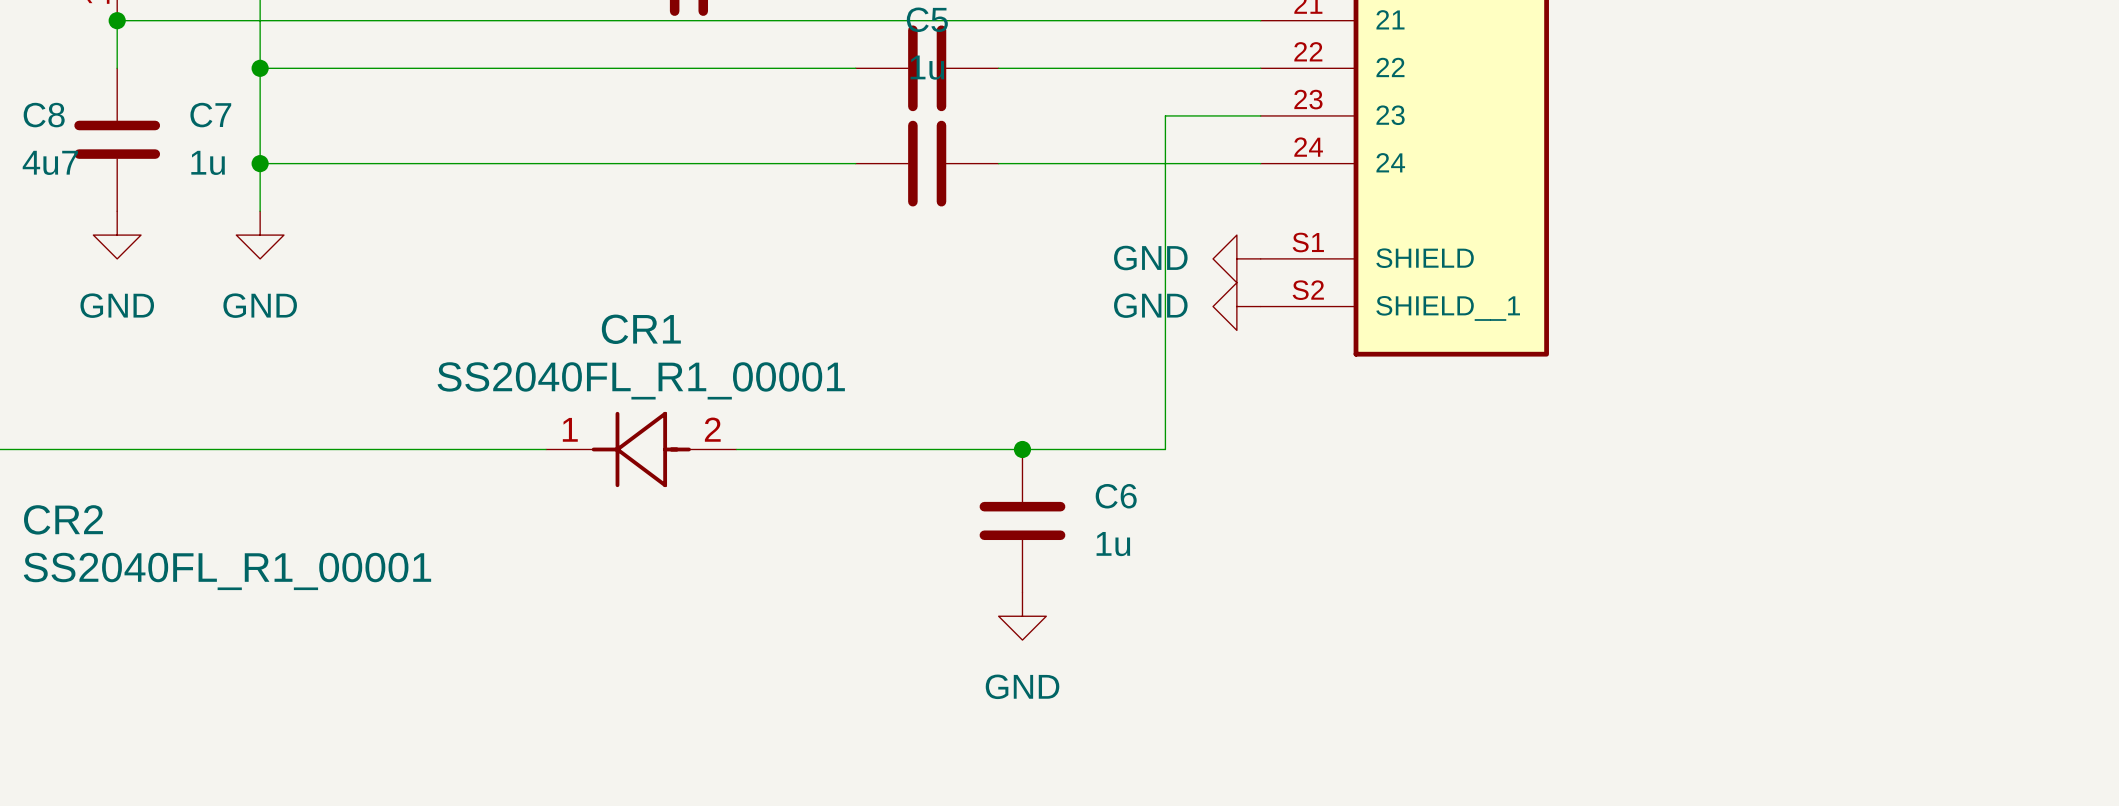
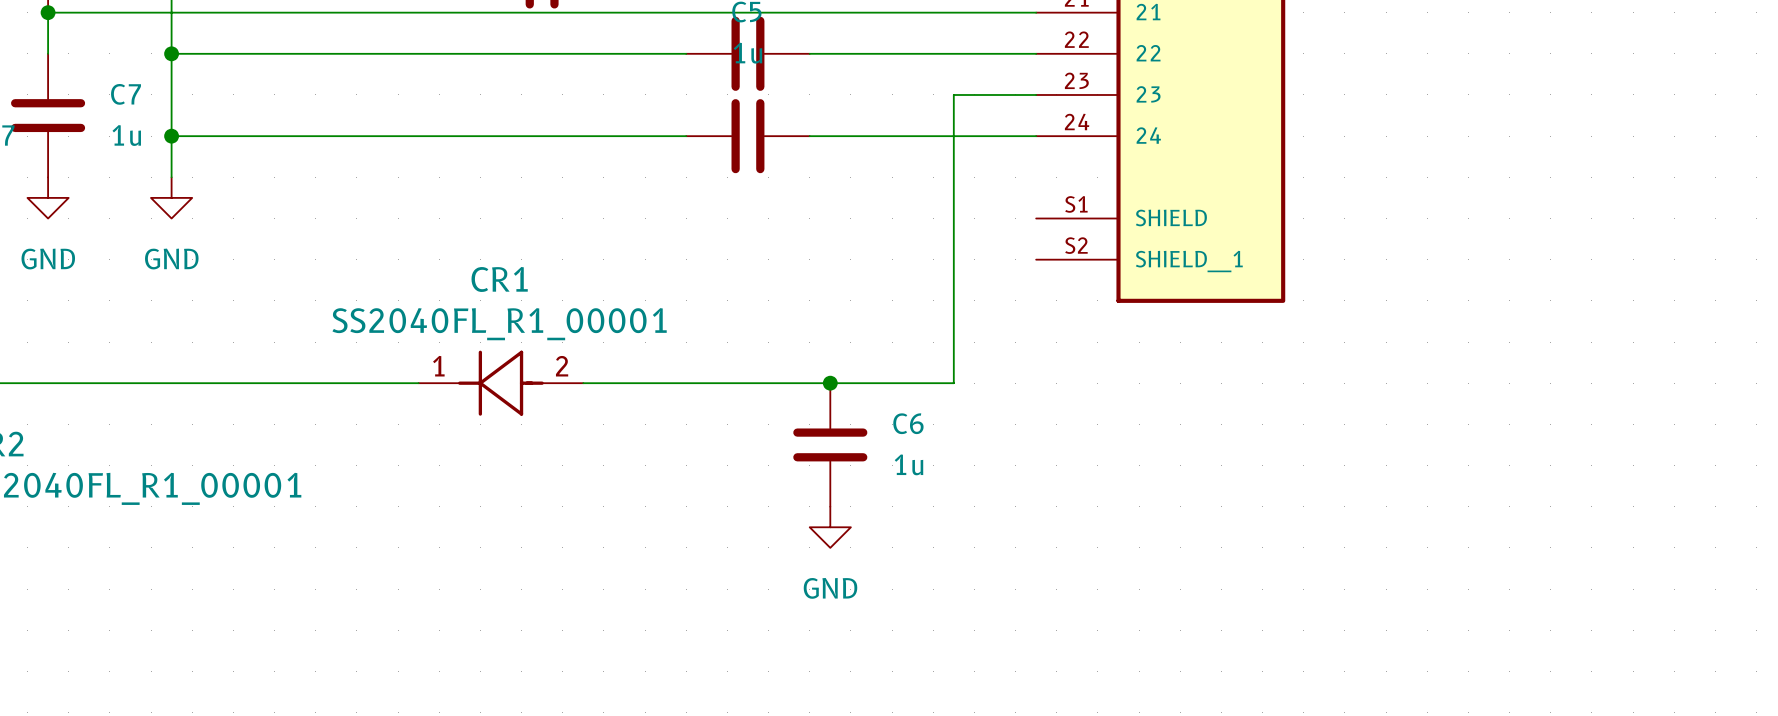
power symbol: GND (1236, 258) -> none
power symbol: GND (1236, 306) -> none

